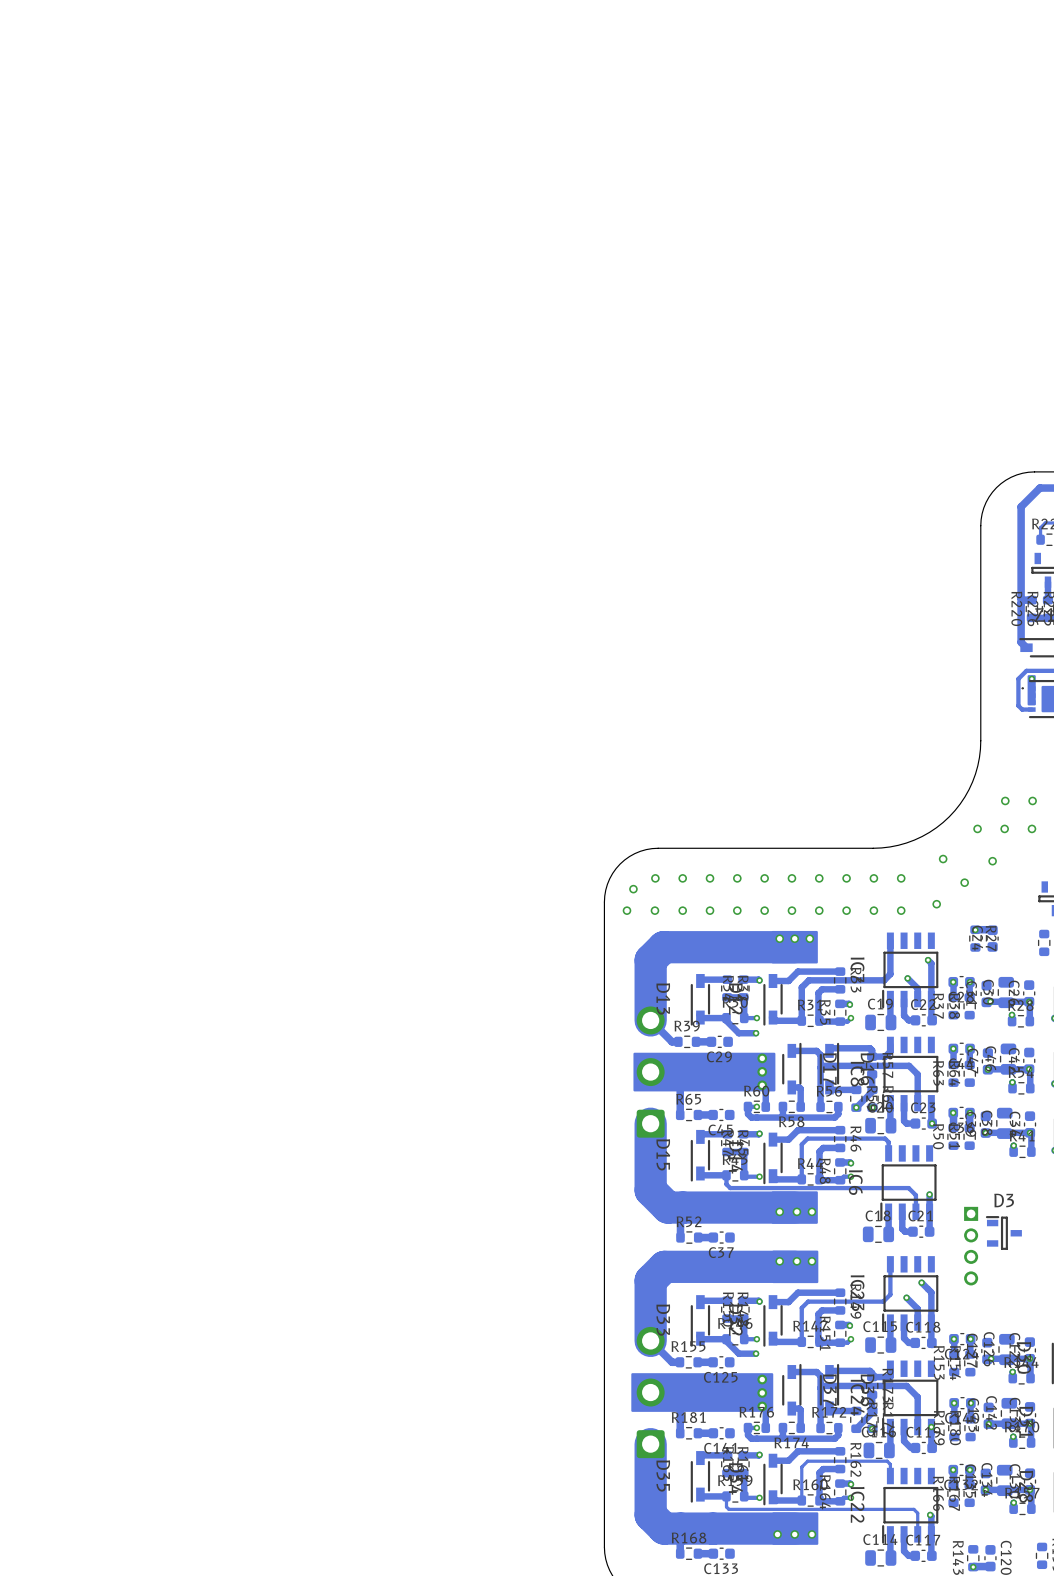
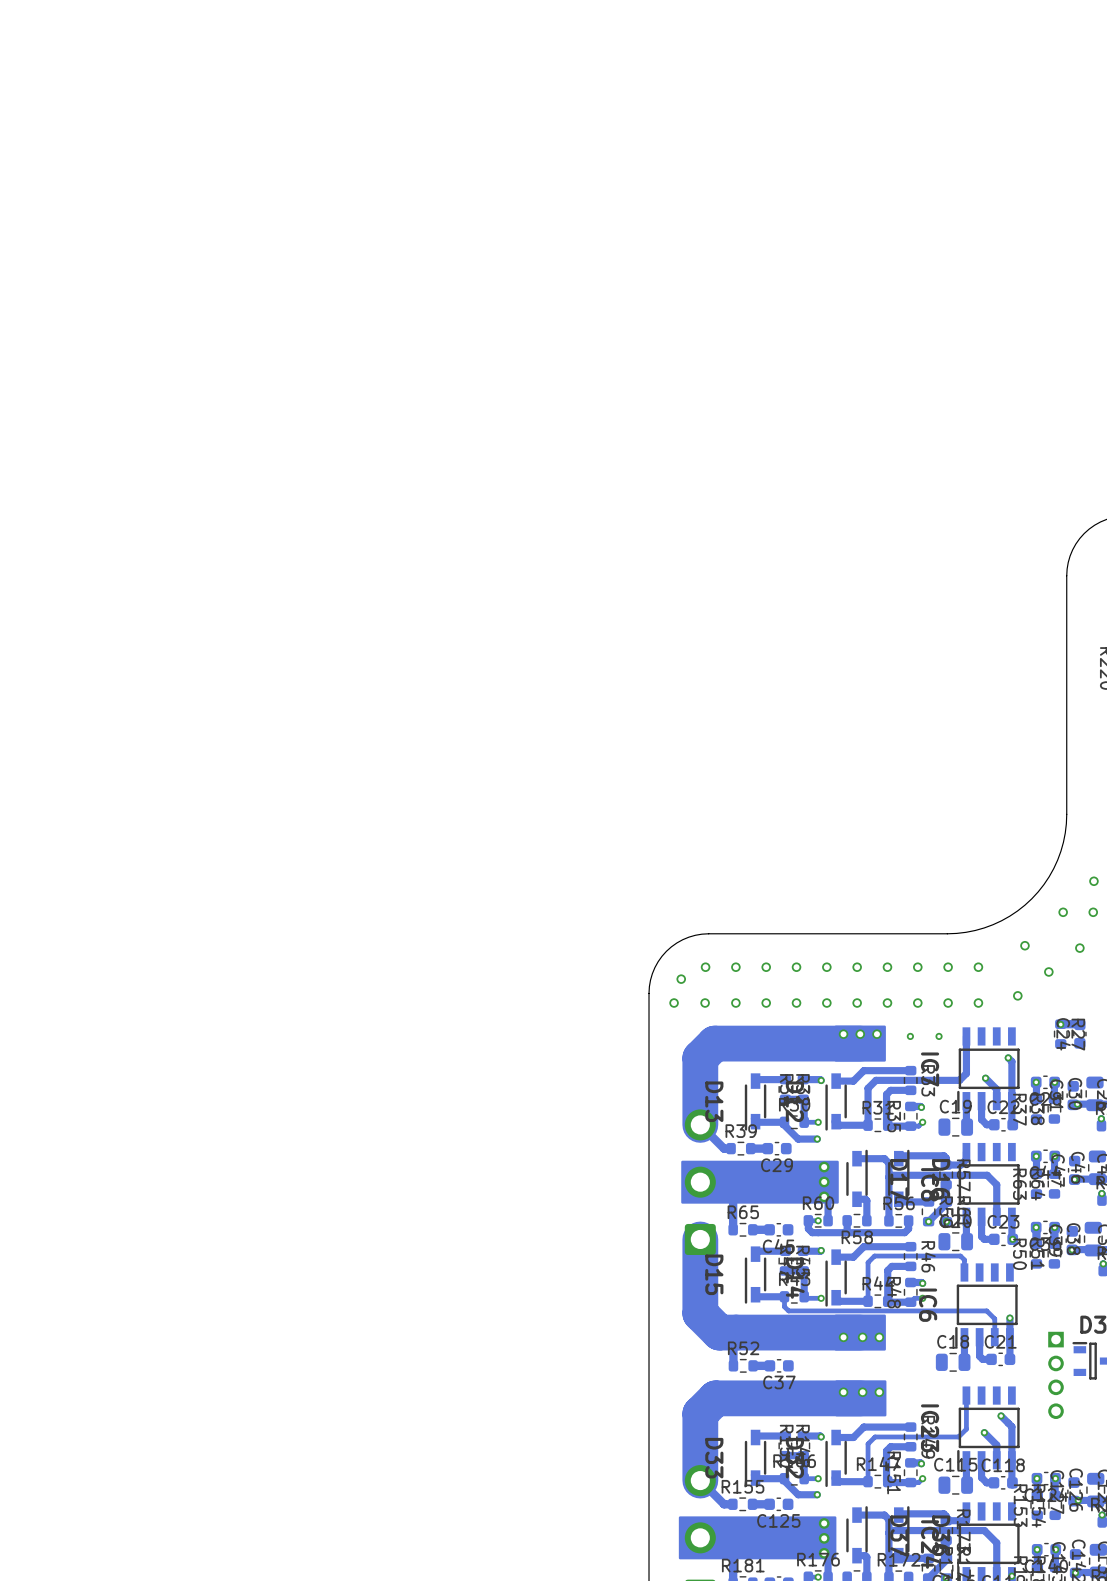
via: none -> (910, 1036)
via: none -> (939, 1036)

